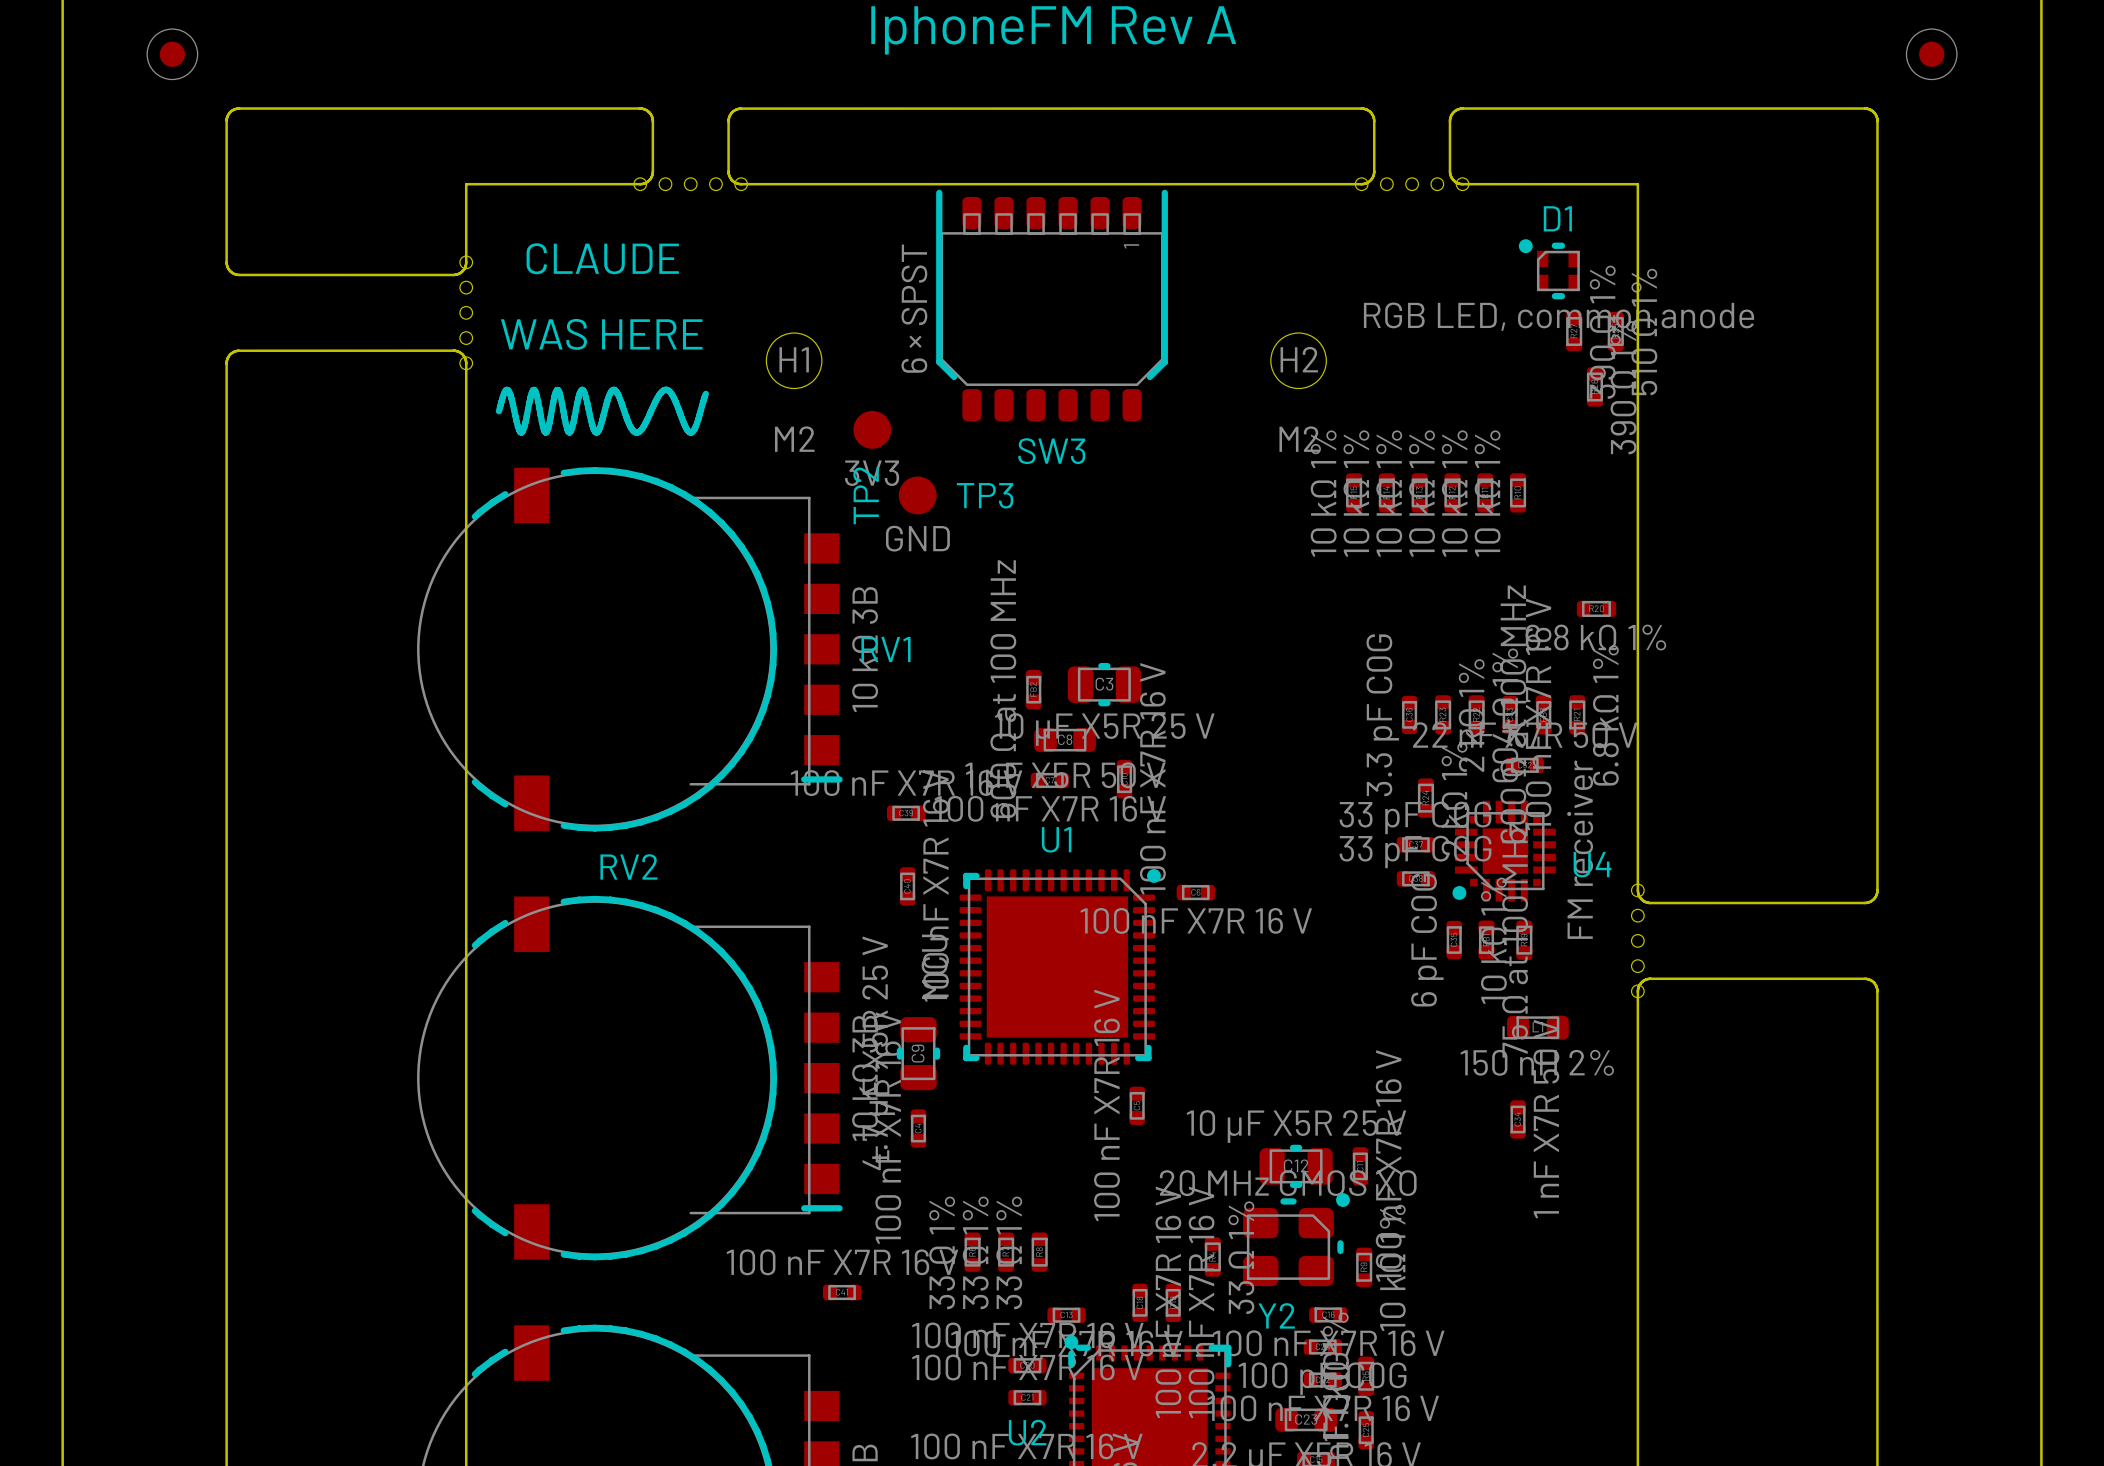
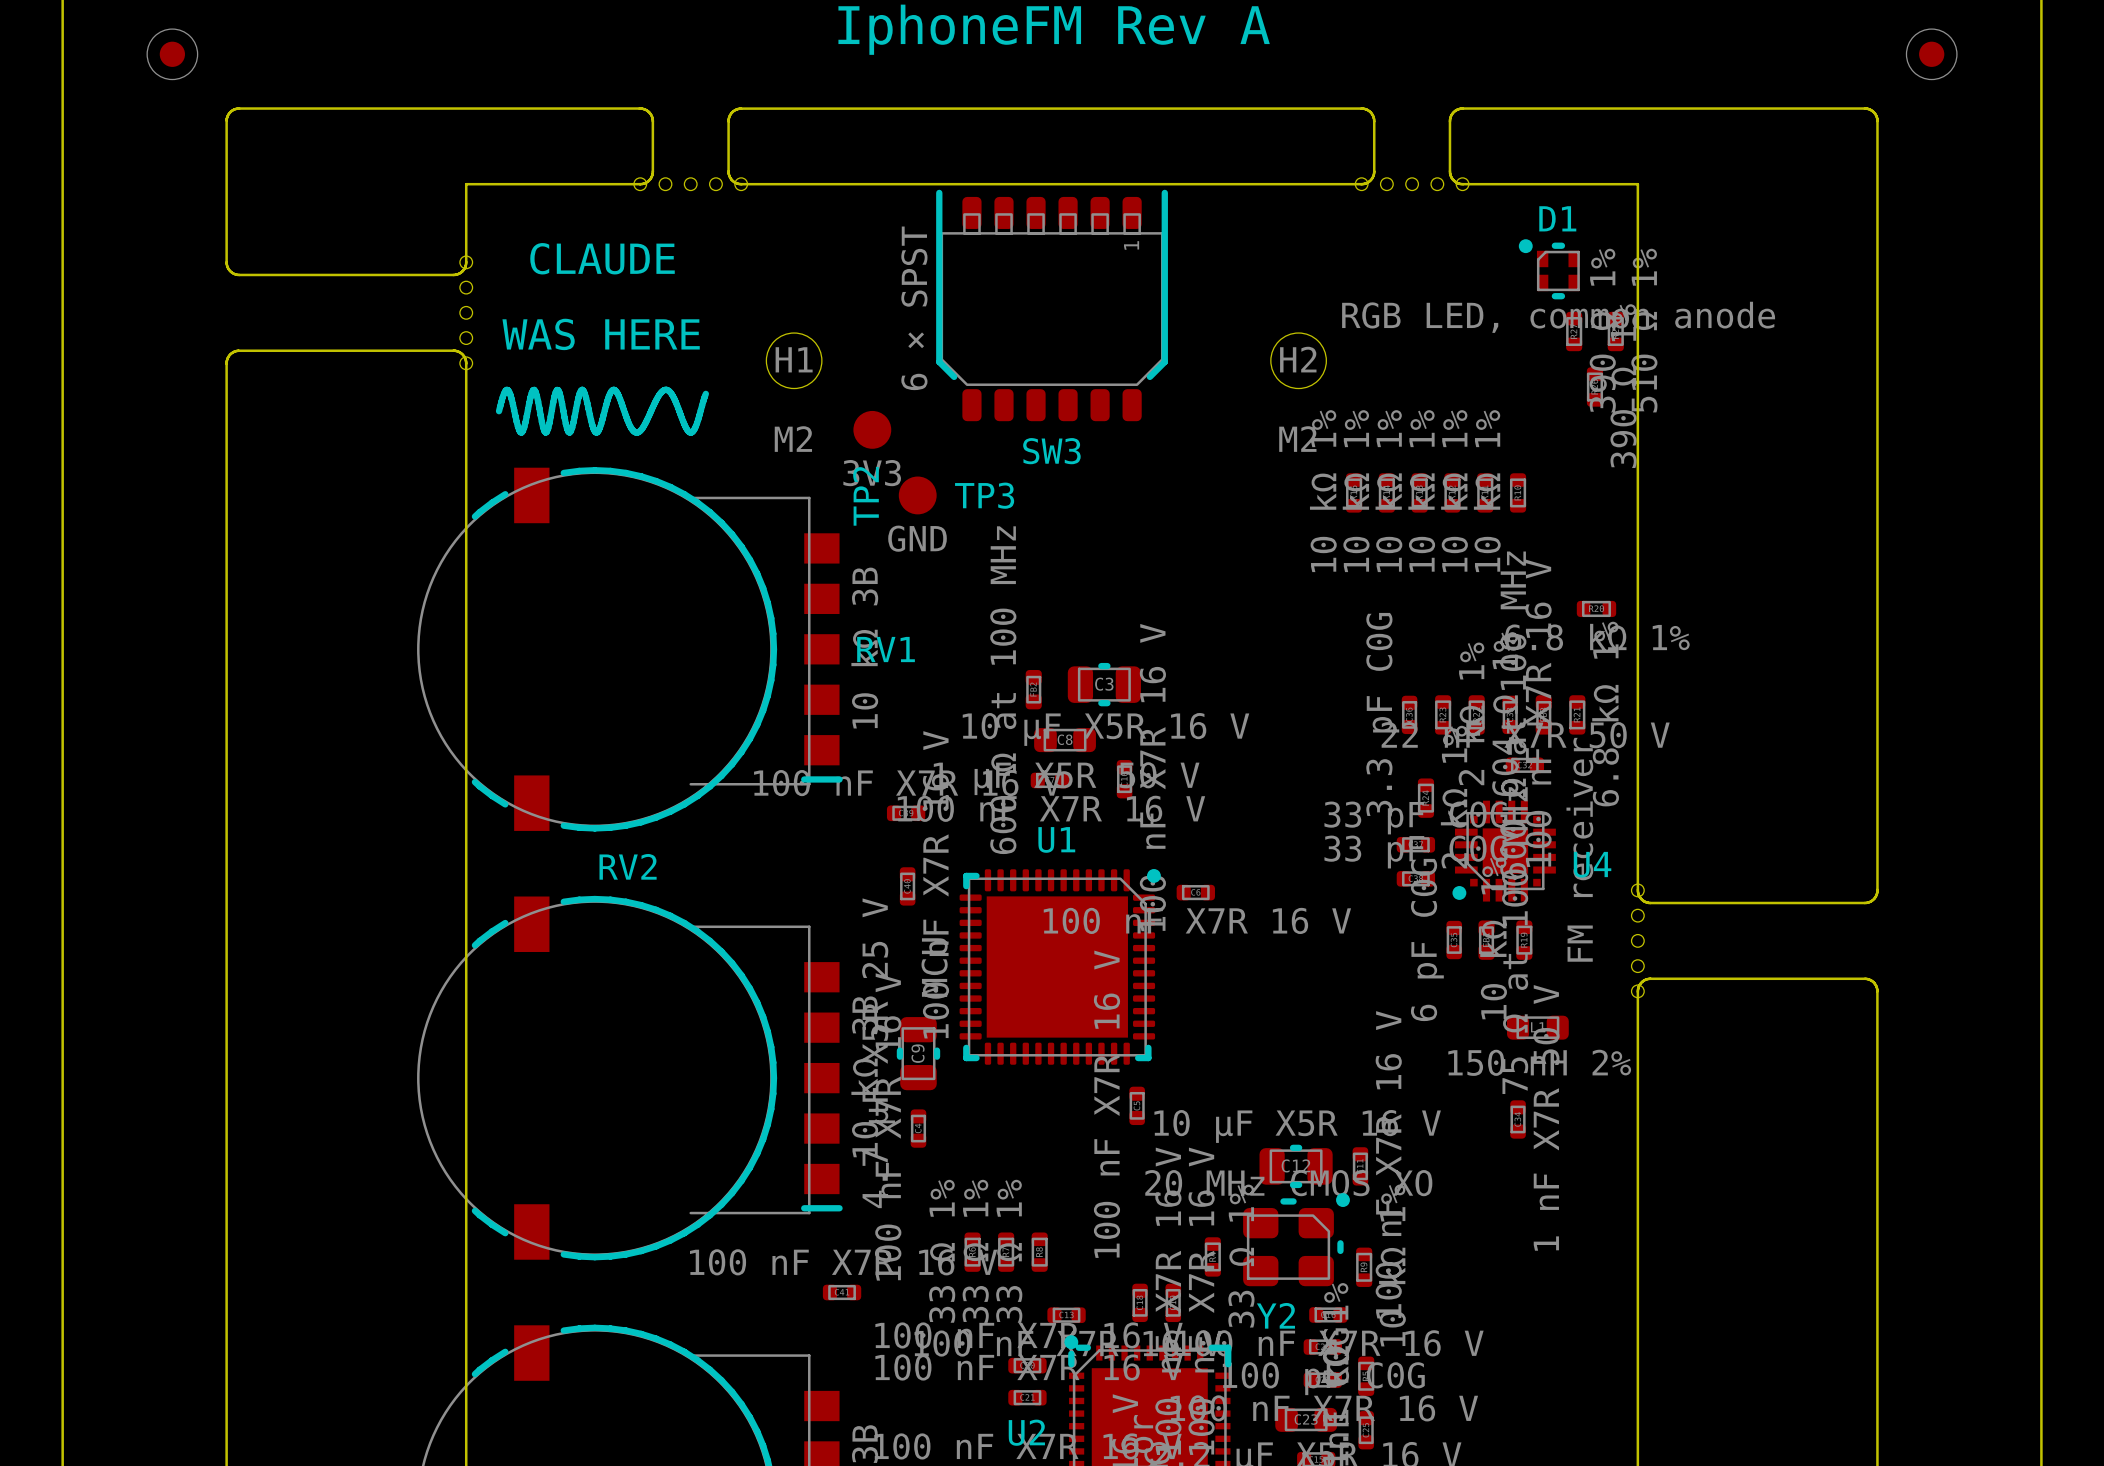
C3 value: 10 µF X5R 25 V (1104, 729) -> 10 µF X5R 16 V (1105, 729)
C12 value: 10 µF X5R 25 V (1296, 1126) -> 10 µF X5R 16 V (1297, 1126)

